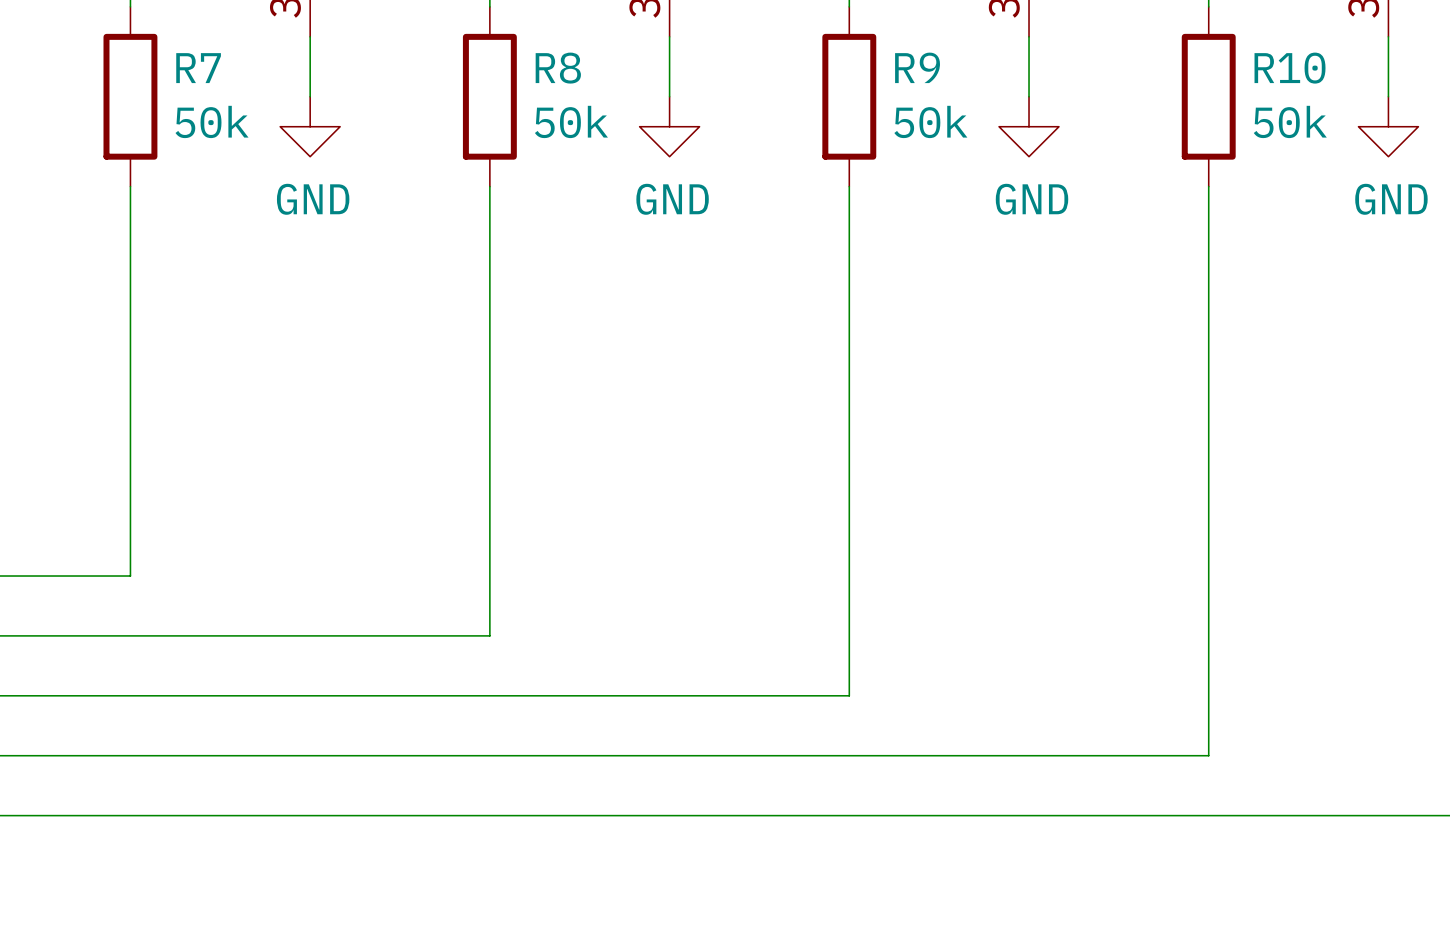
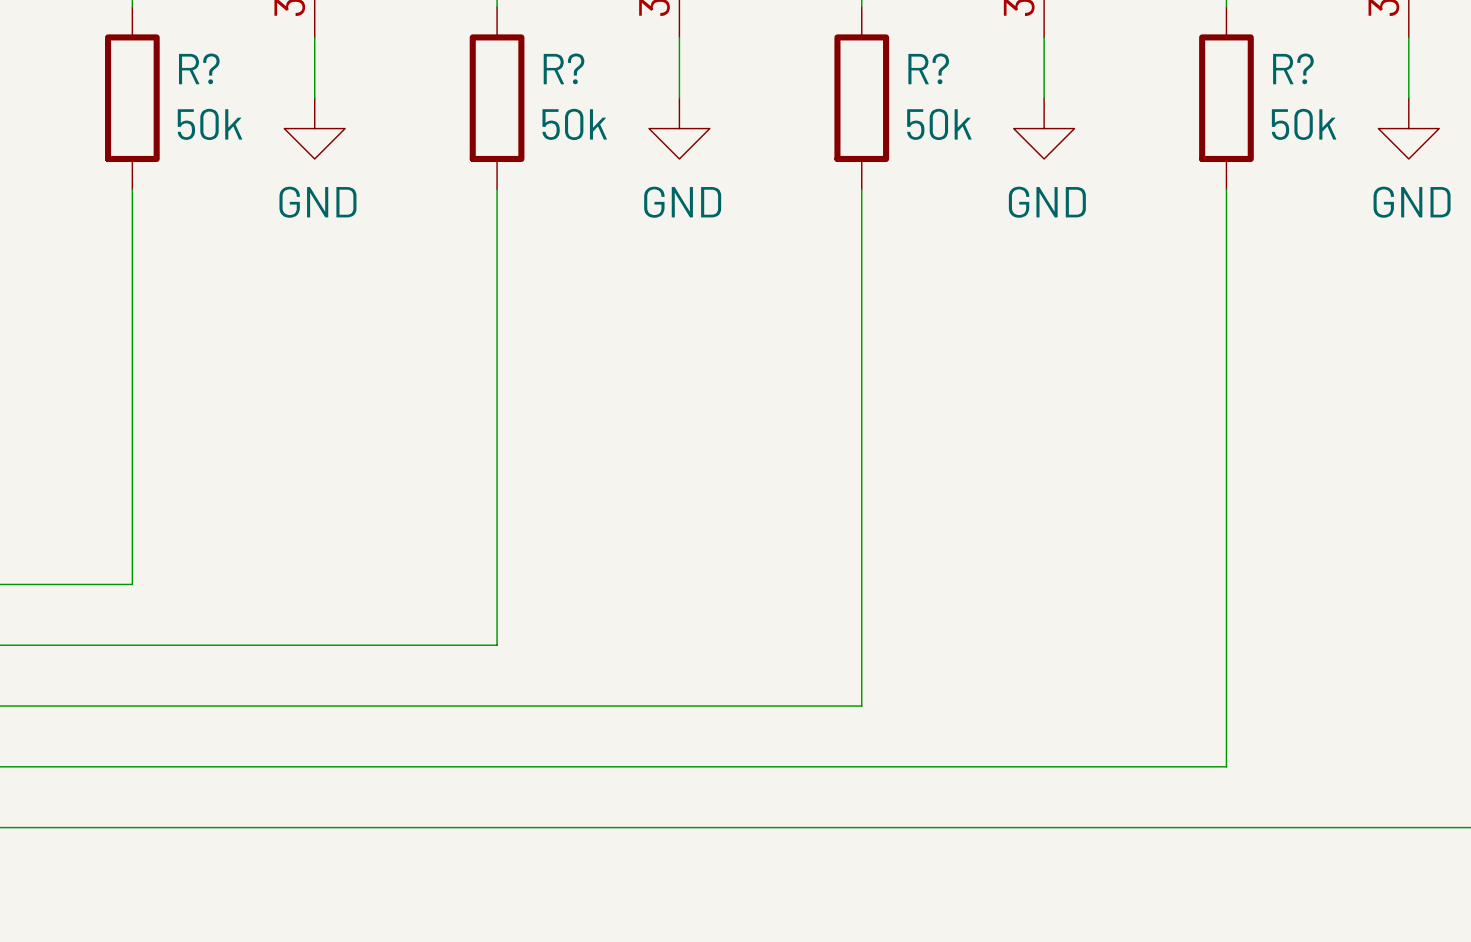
R9 name: R9 (917, 67) -> R? (928, 68)
R7 name: R7 (198, 68) -> R? (199, 68)
R8 name: R8 (558, 68) -> R? (564, 68)
R10 name: R10 (1290, 68) -> R? (1293, 68)

